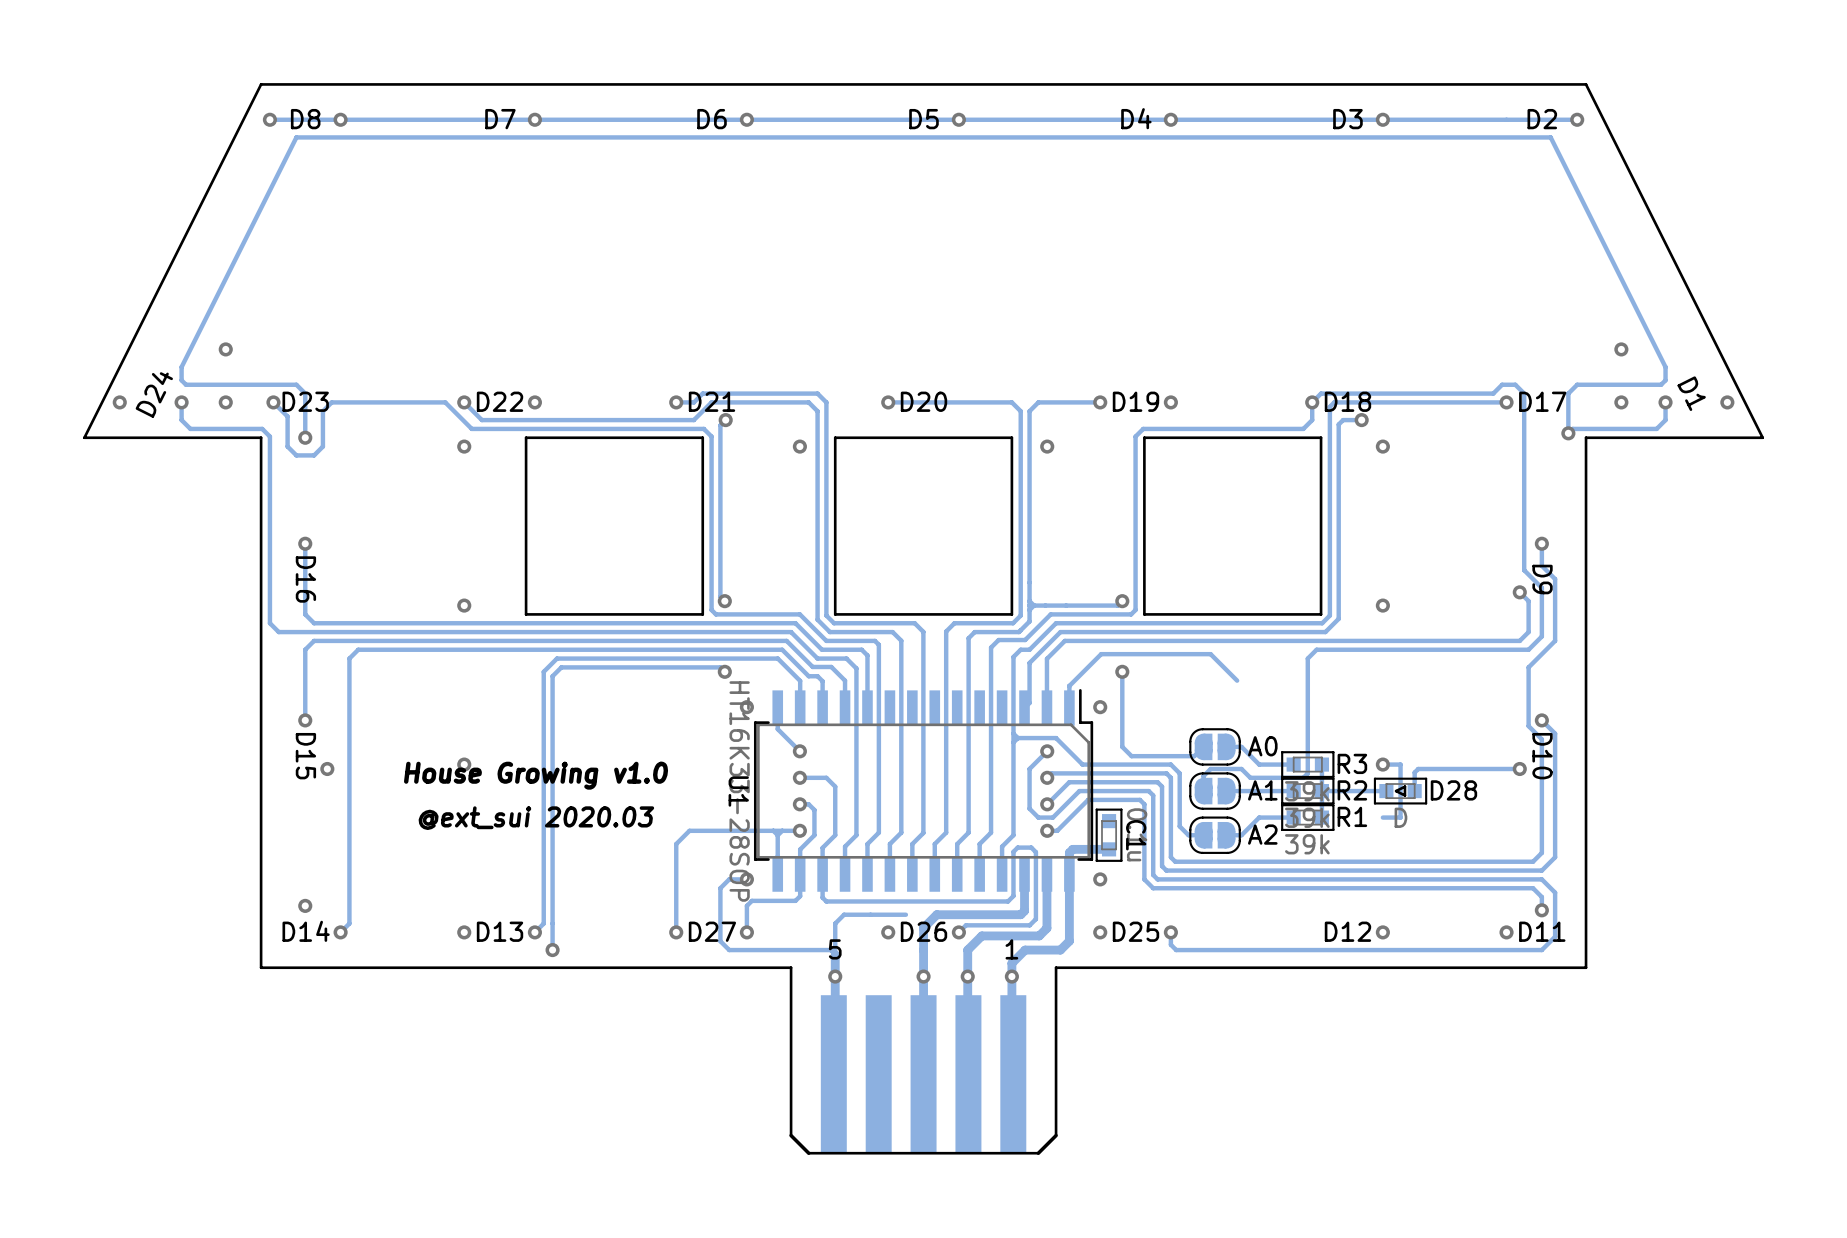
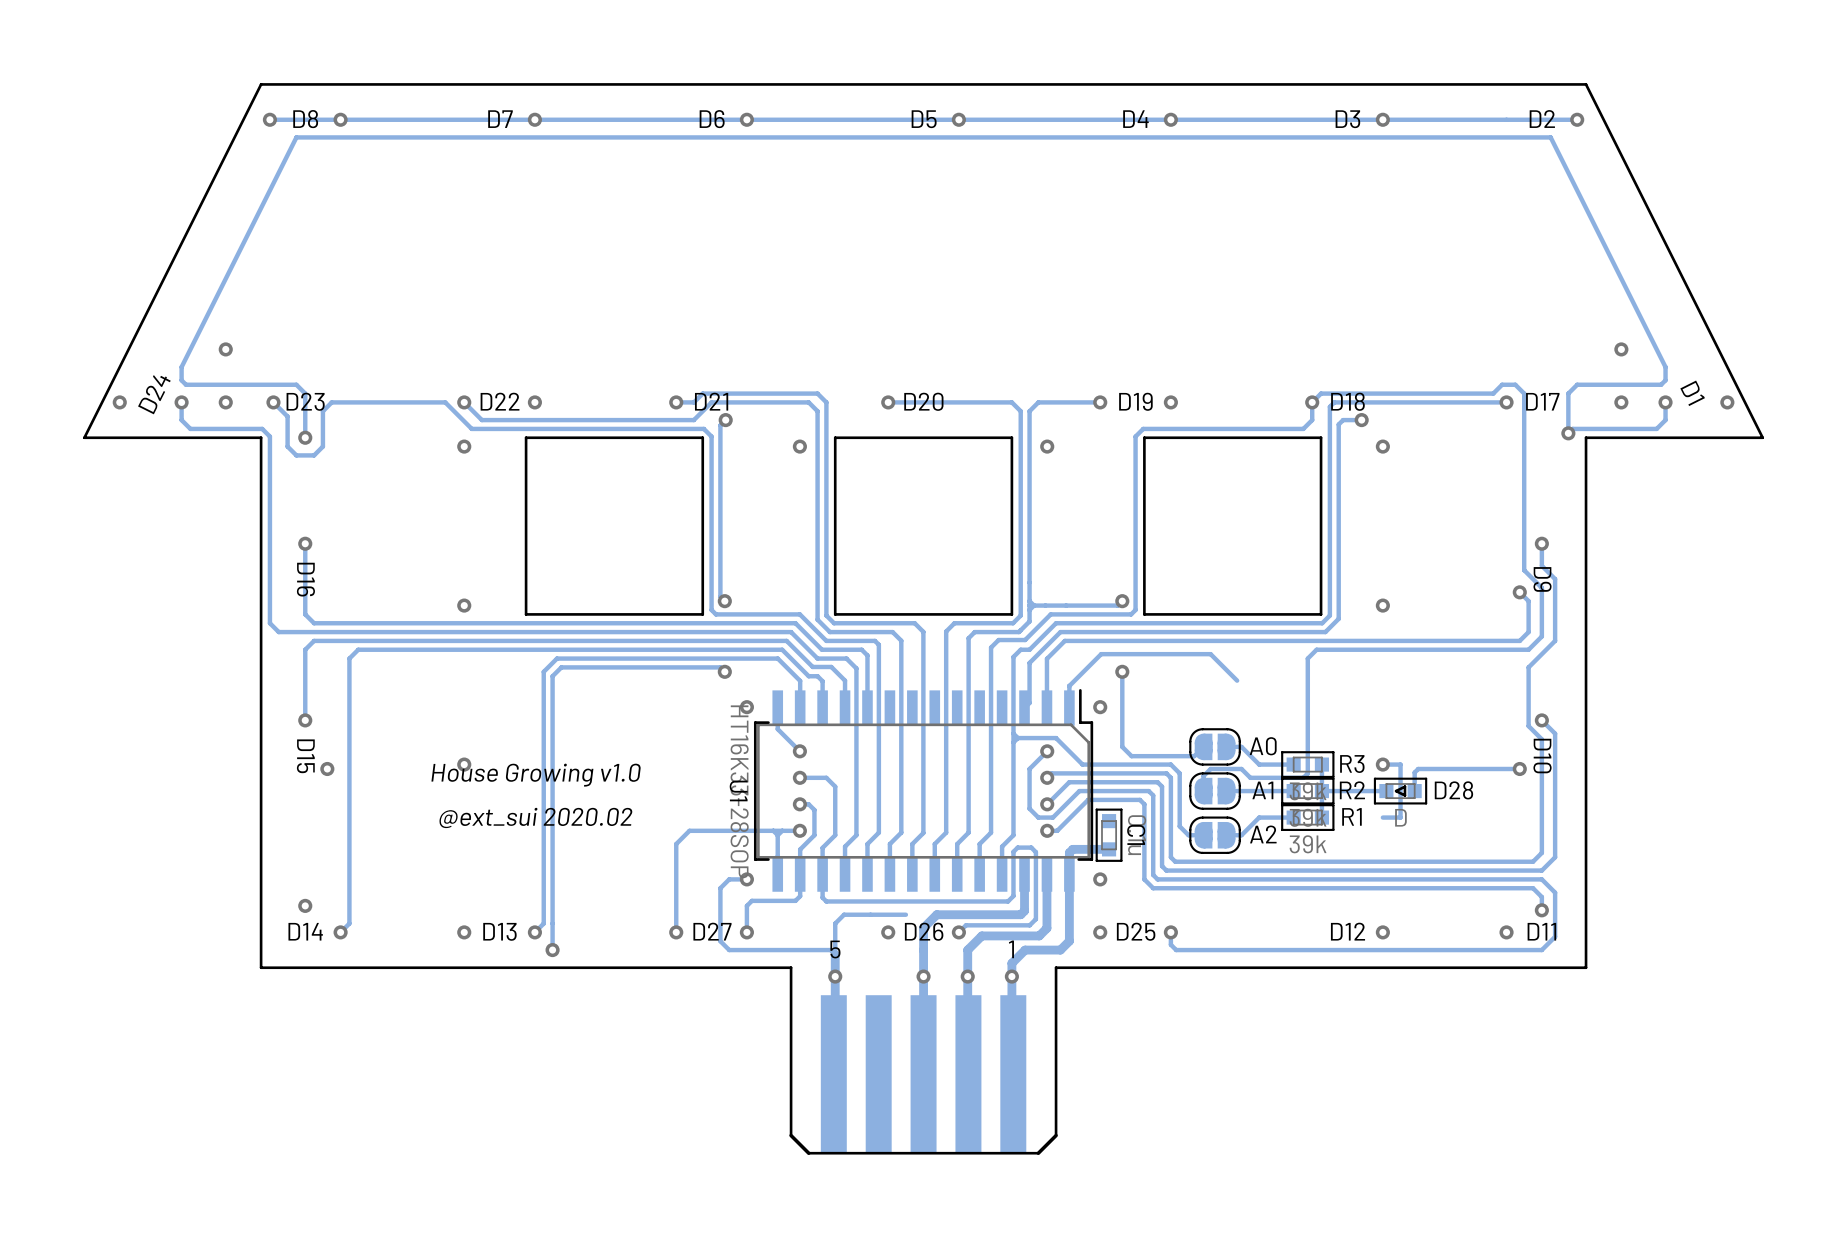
text: @ext_sui 2020.03 (536, 818) -> @ext_sui 2020.02 (535, 817)

